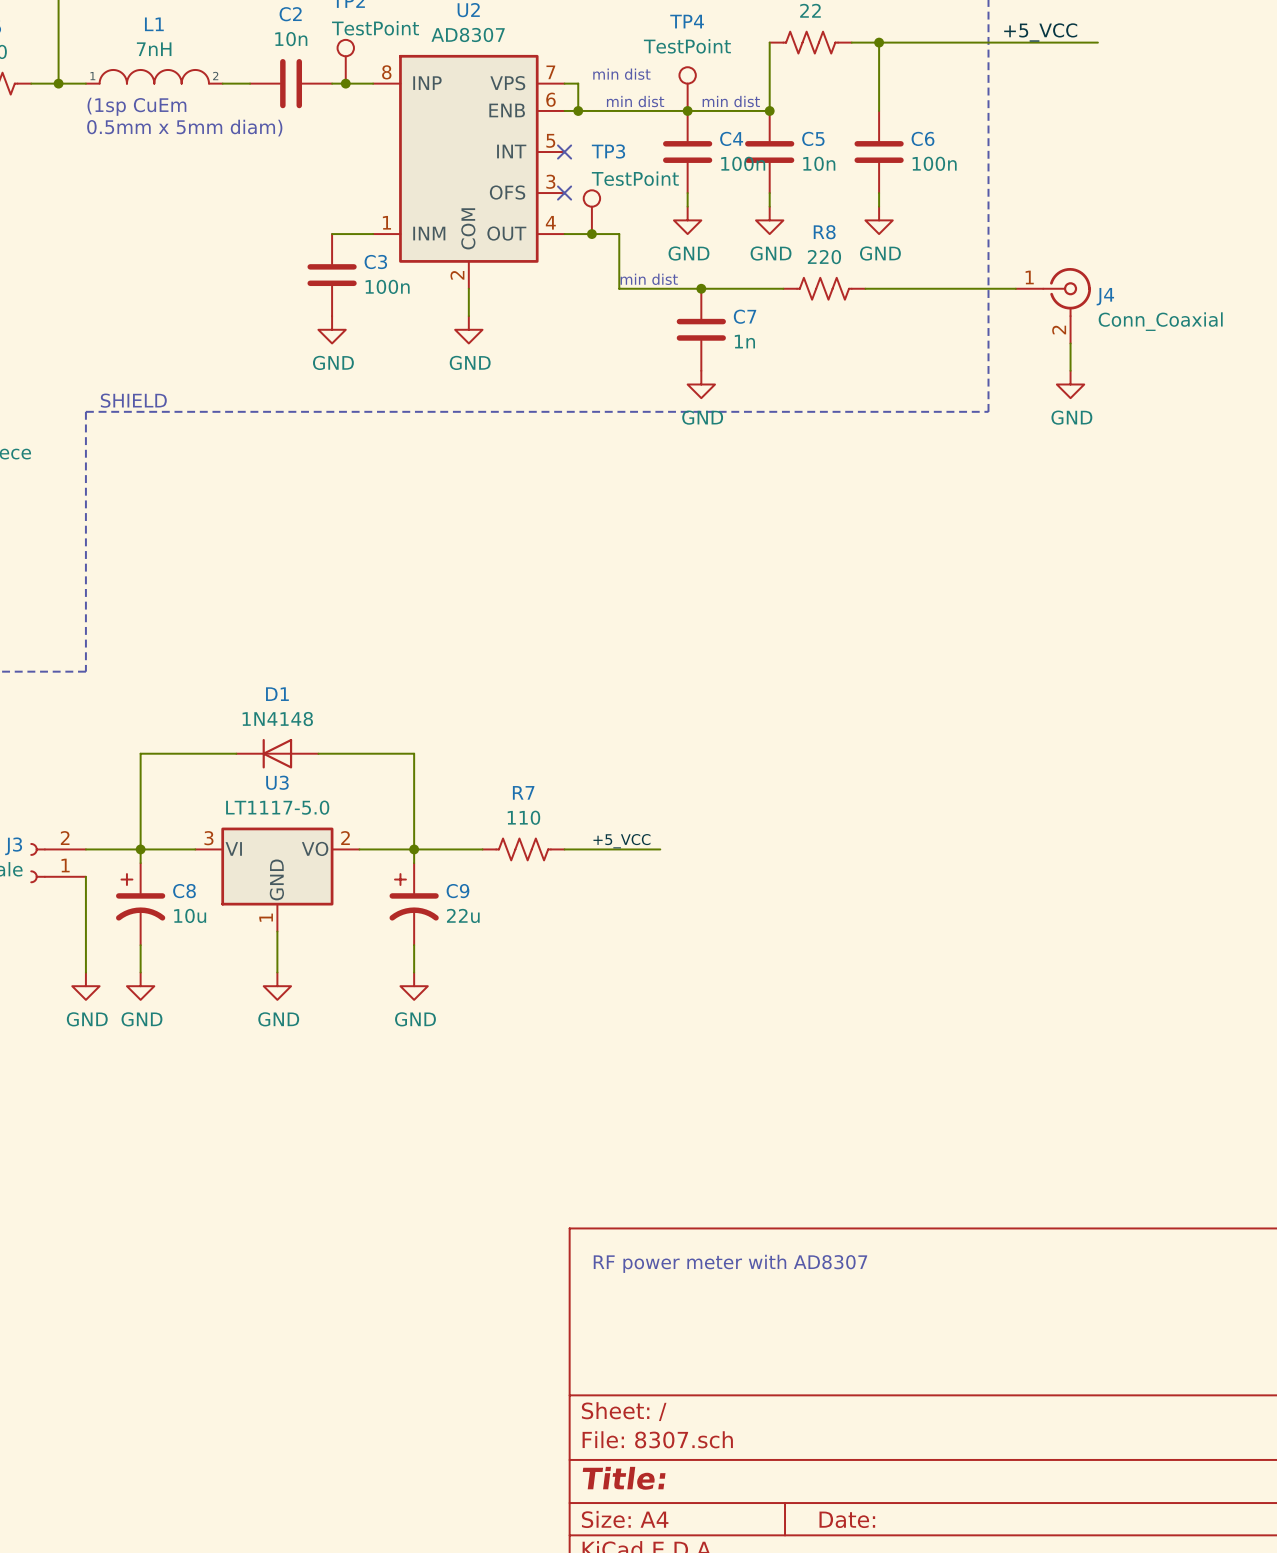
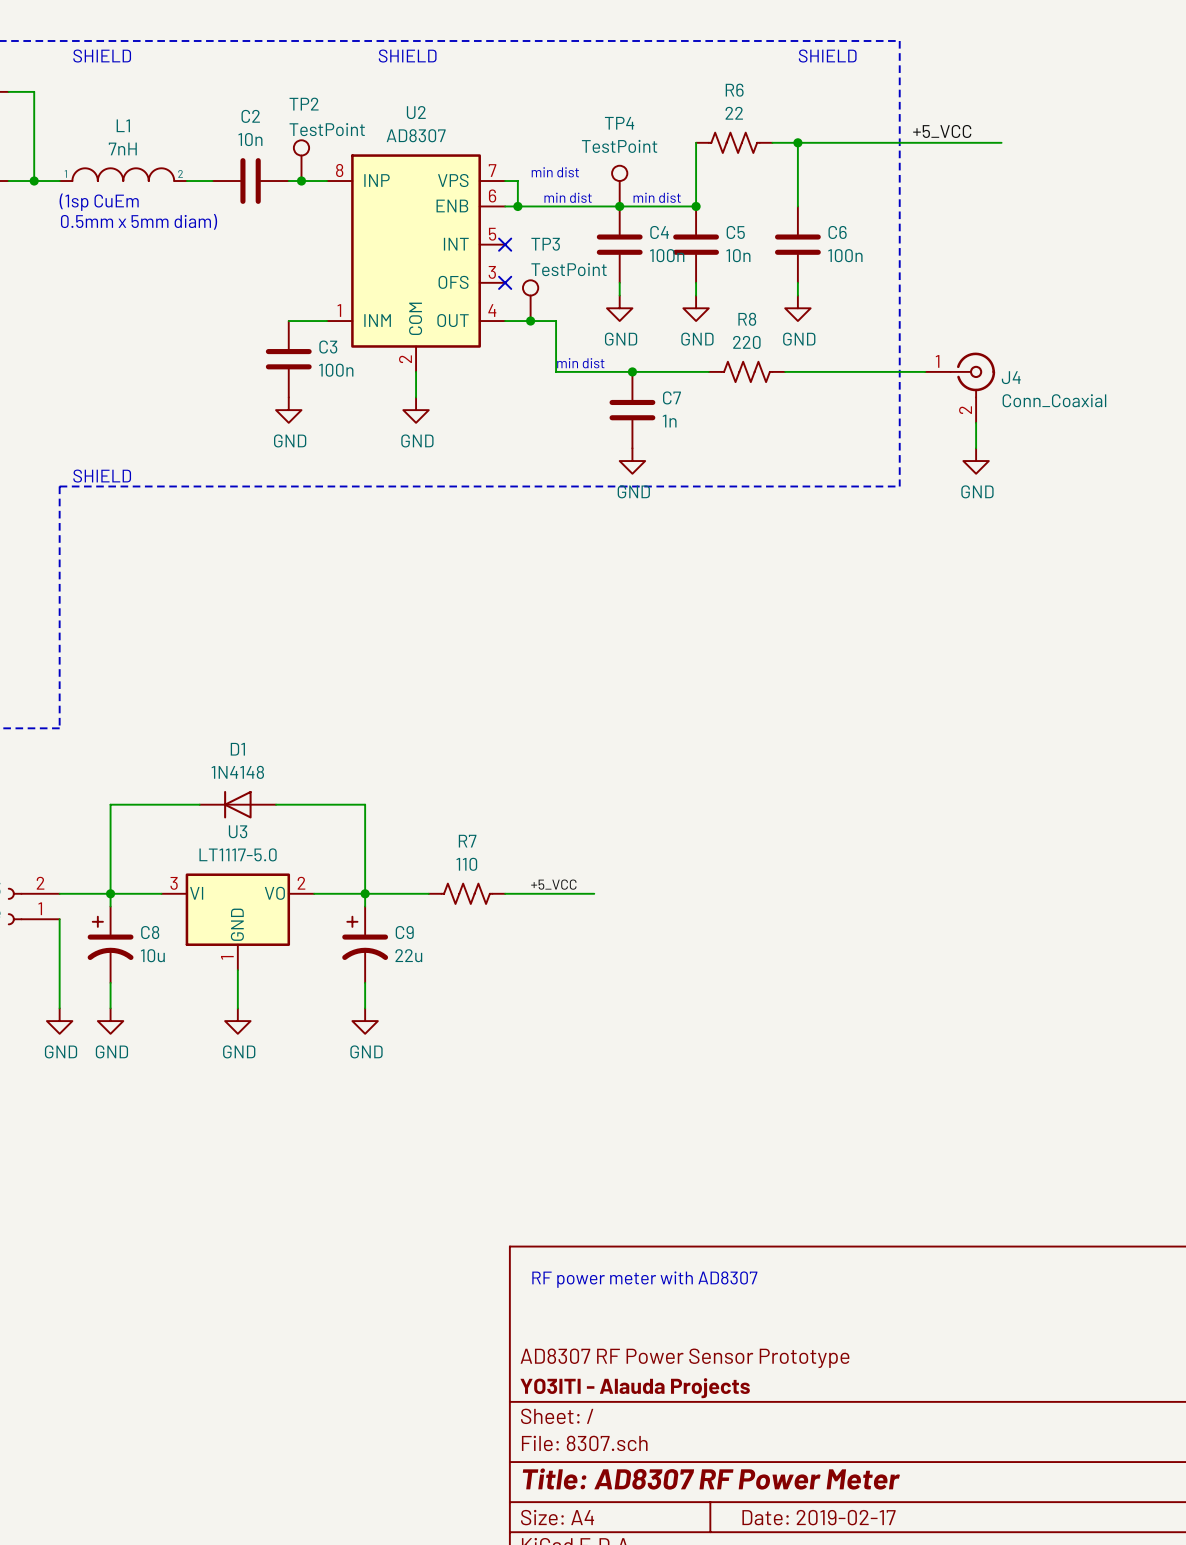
title block: none -> AD8307 RF Power Sensor Prototype (684, 1358)
title block: none -> YO3ITI - Alauda Projects (635, 1388)
title block: Title: (624, 1478) -> Title: AD8307 RF Power Meter (711, 1479)
title block: Date: (847, 1519) -> Date: 2019-02-17 (819, 1517)

